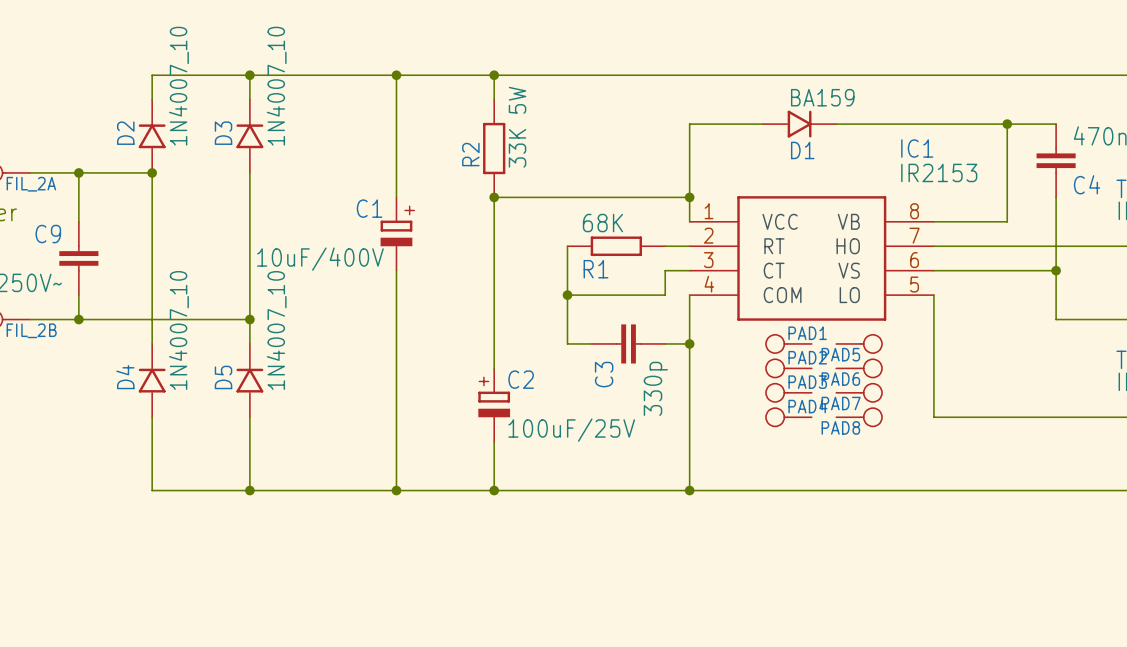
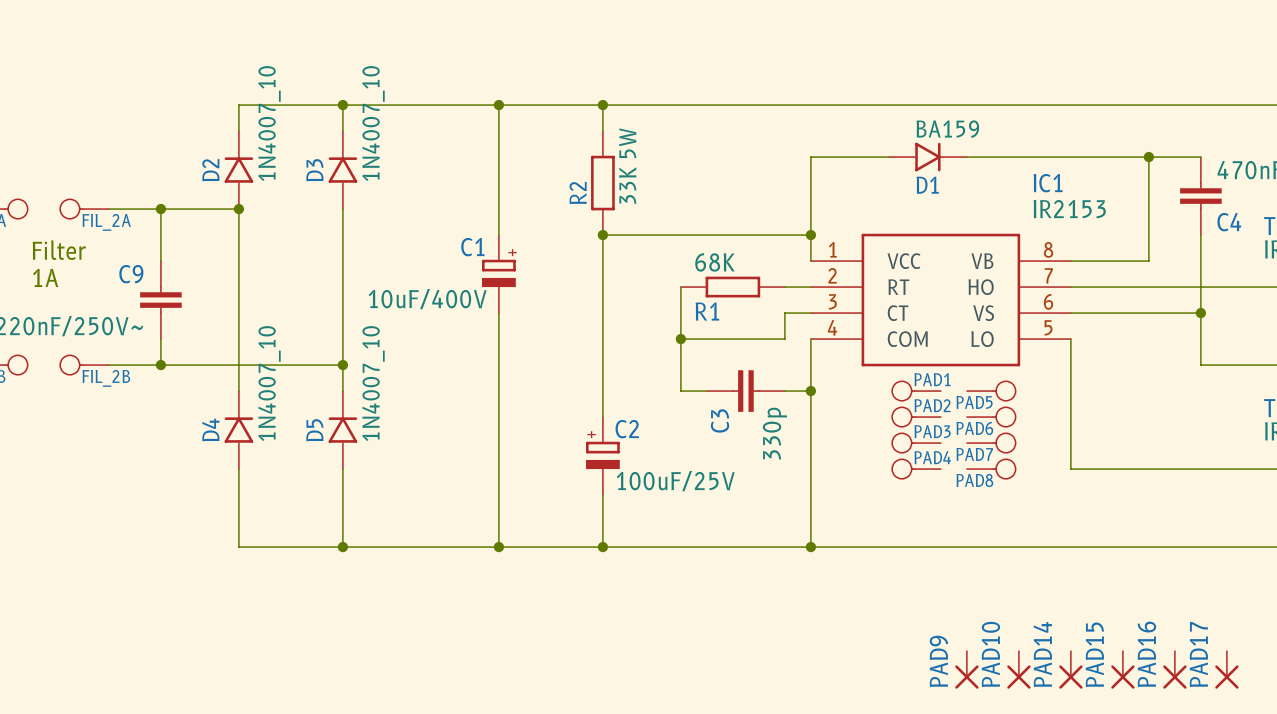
PAD9: none -> (966, 669)
PAD10: none -> (1018, 669)
PAD14: none -> (1070, 669)
PAD15: none -> (1122, 669)
PAD16: none -> (1174, 669)
PAD17: none -> (1226, 669)

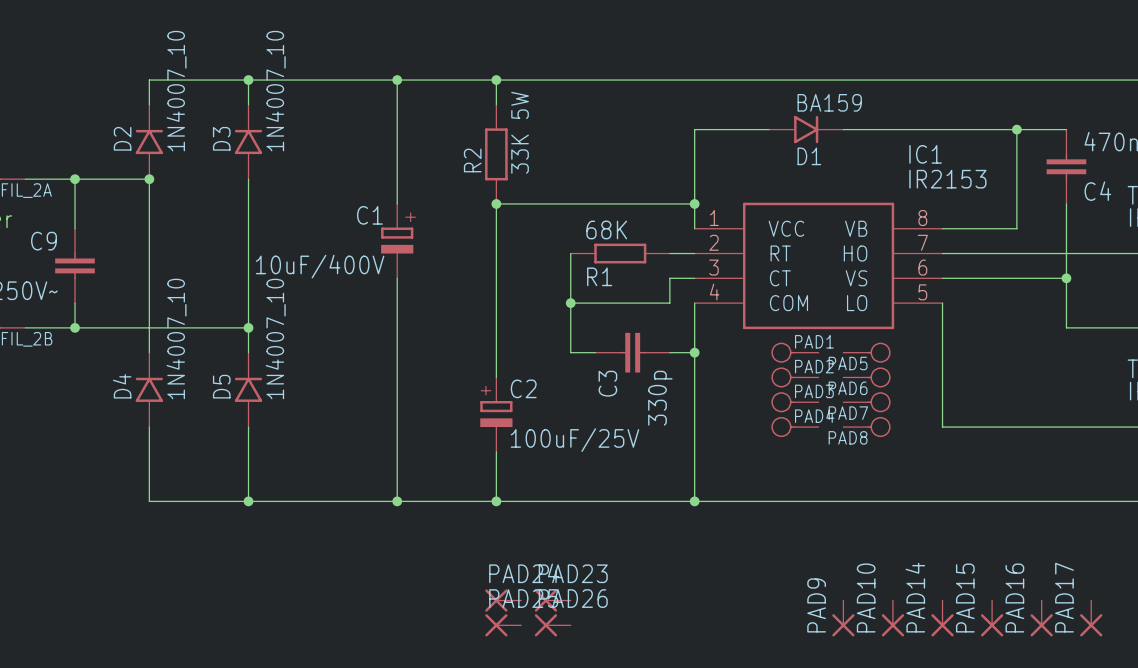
PAD24: none -> (503, 600)
PAD23: none -> (552, 600)
PAD25: none -> (503, 625)
PAD26: none -> (552, 625)

